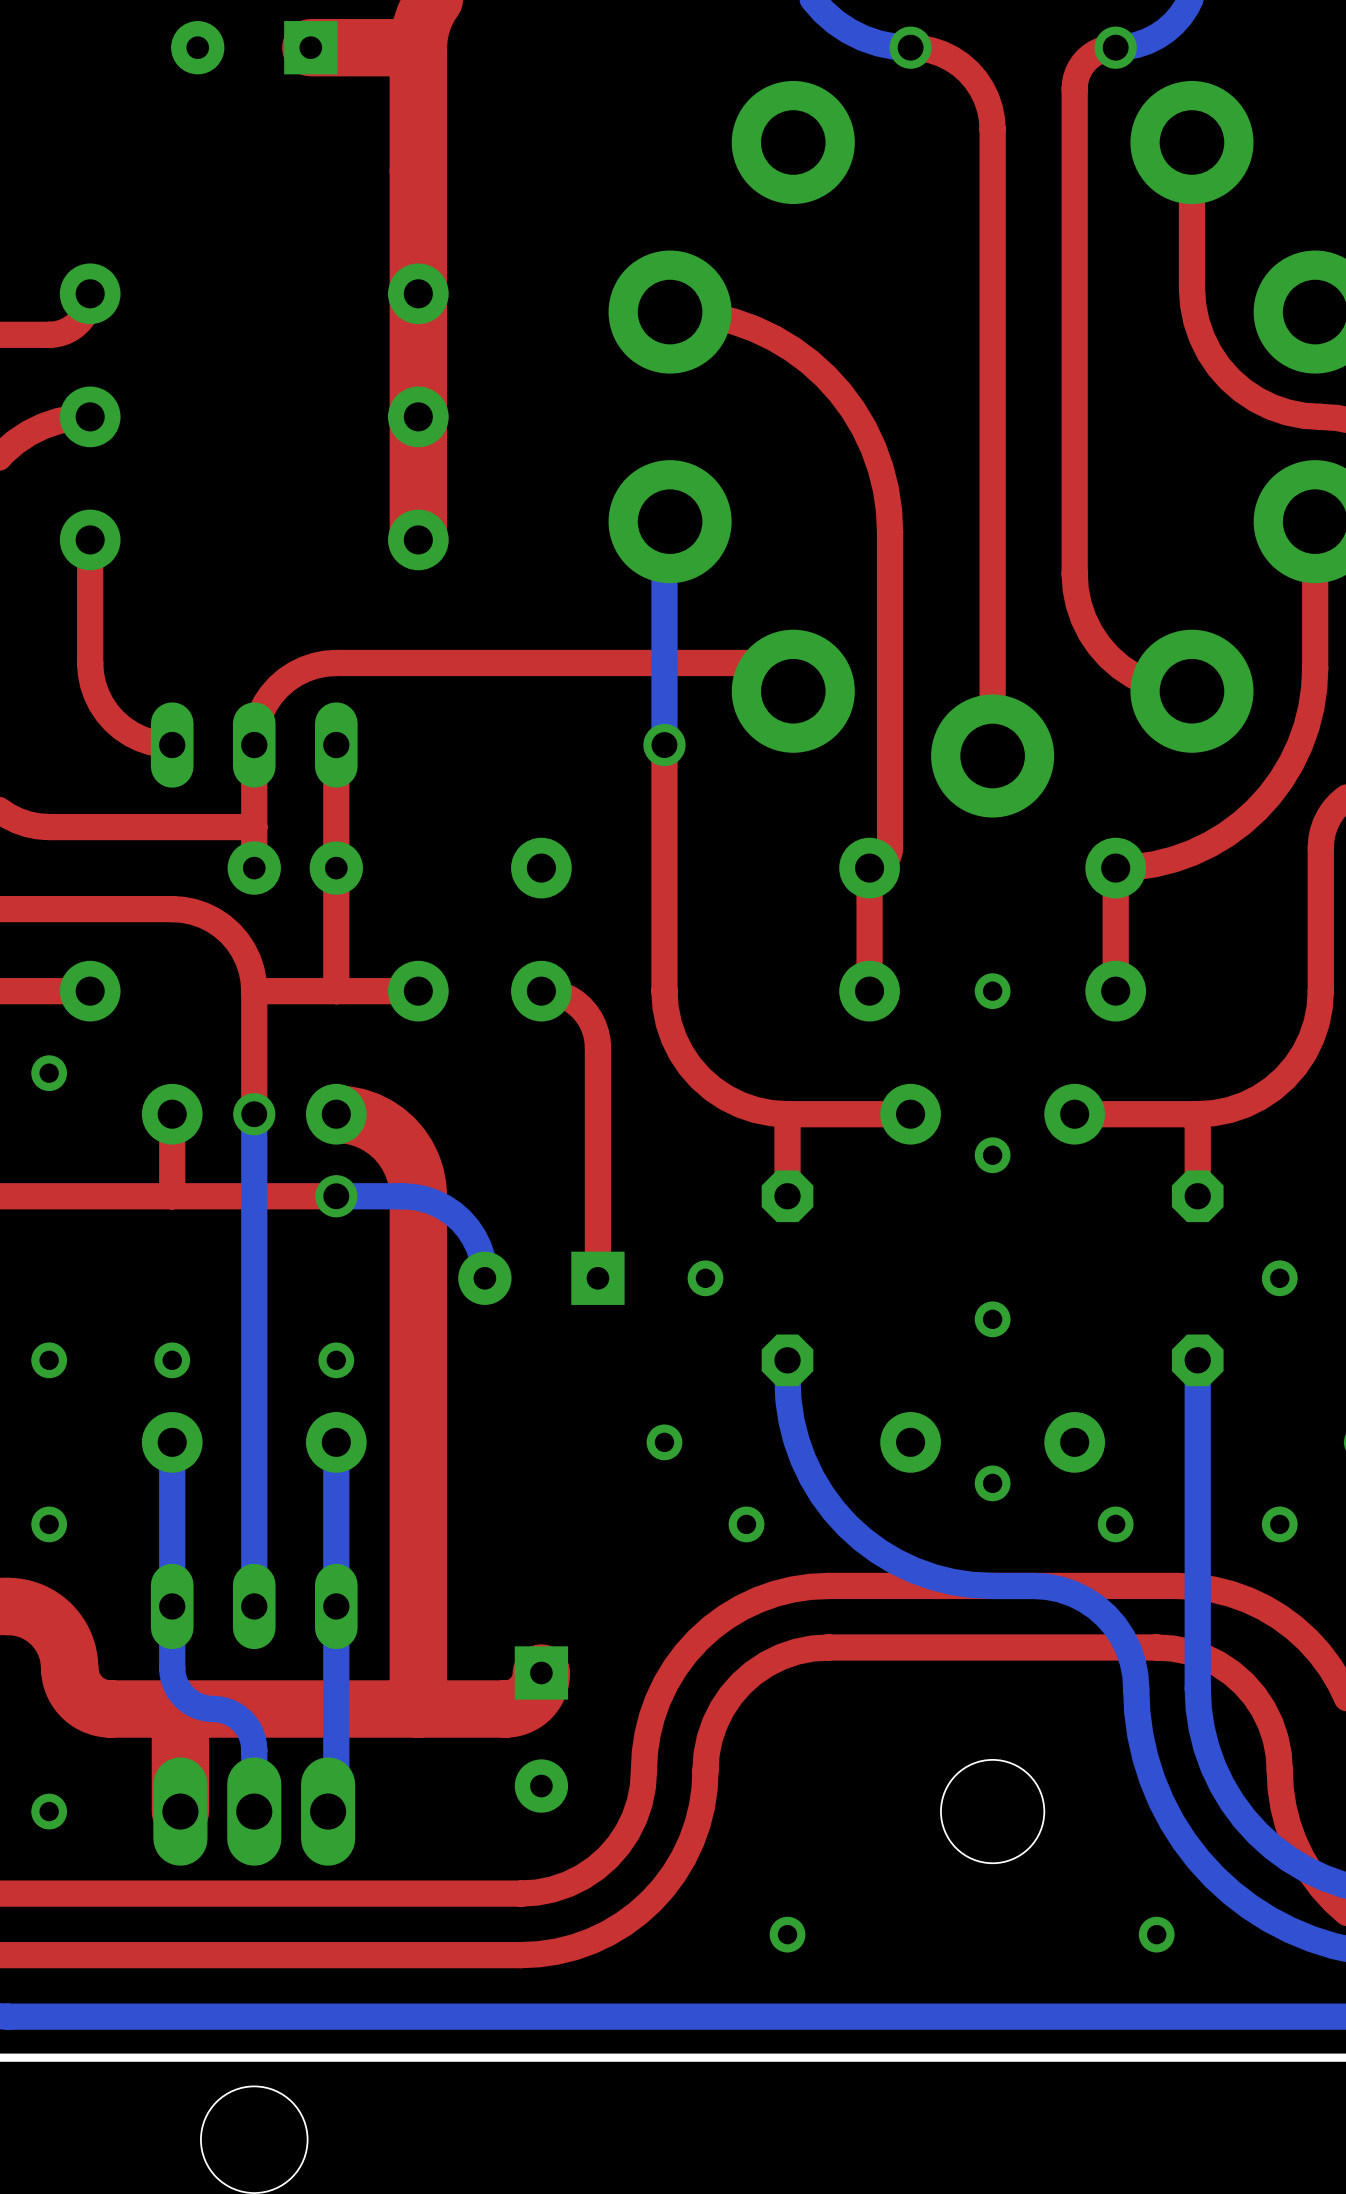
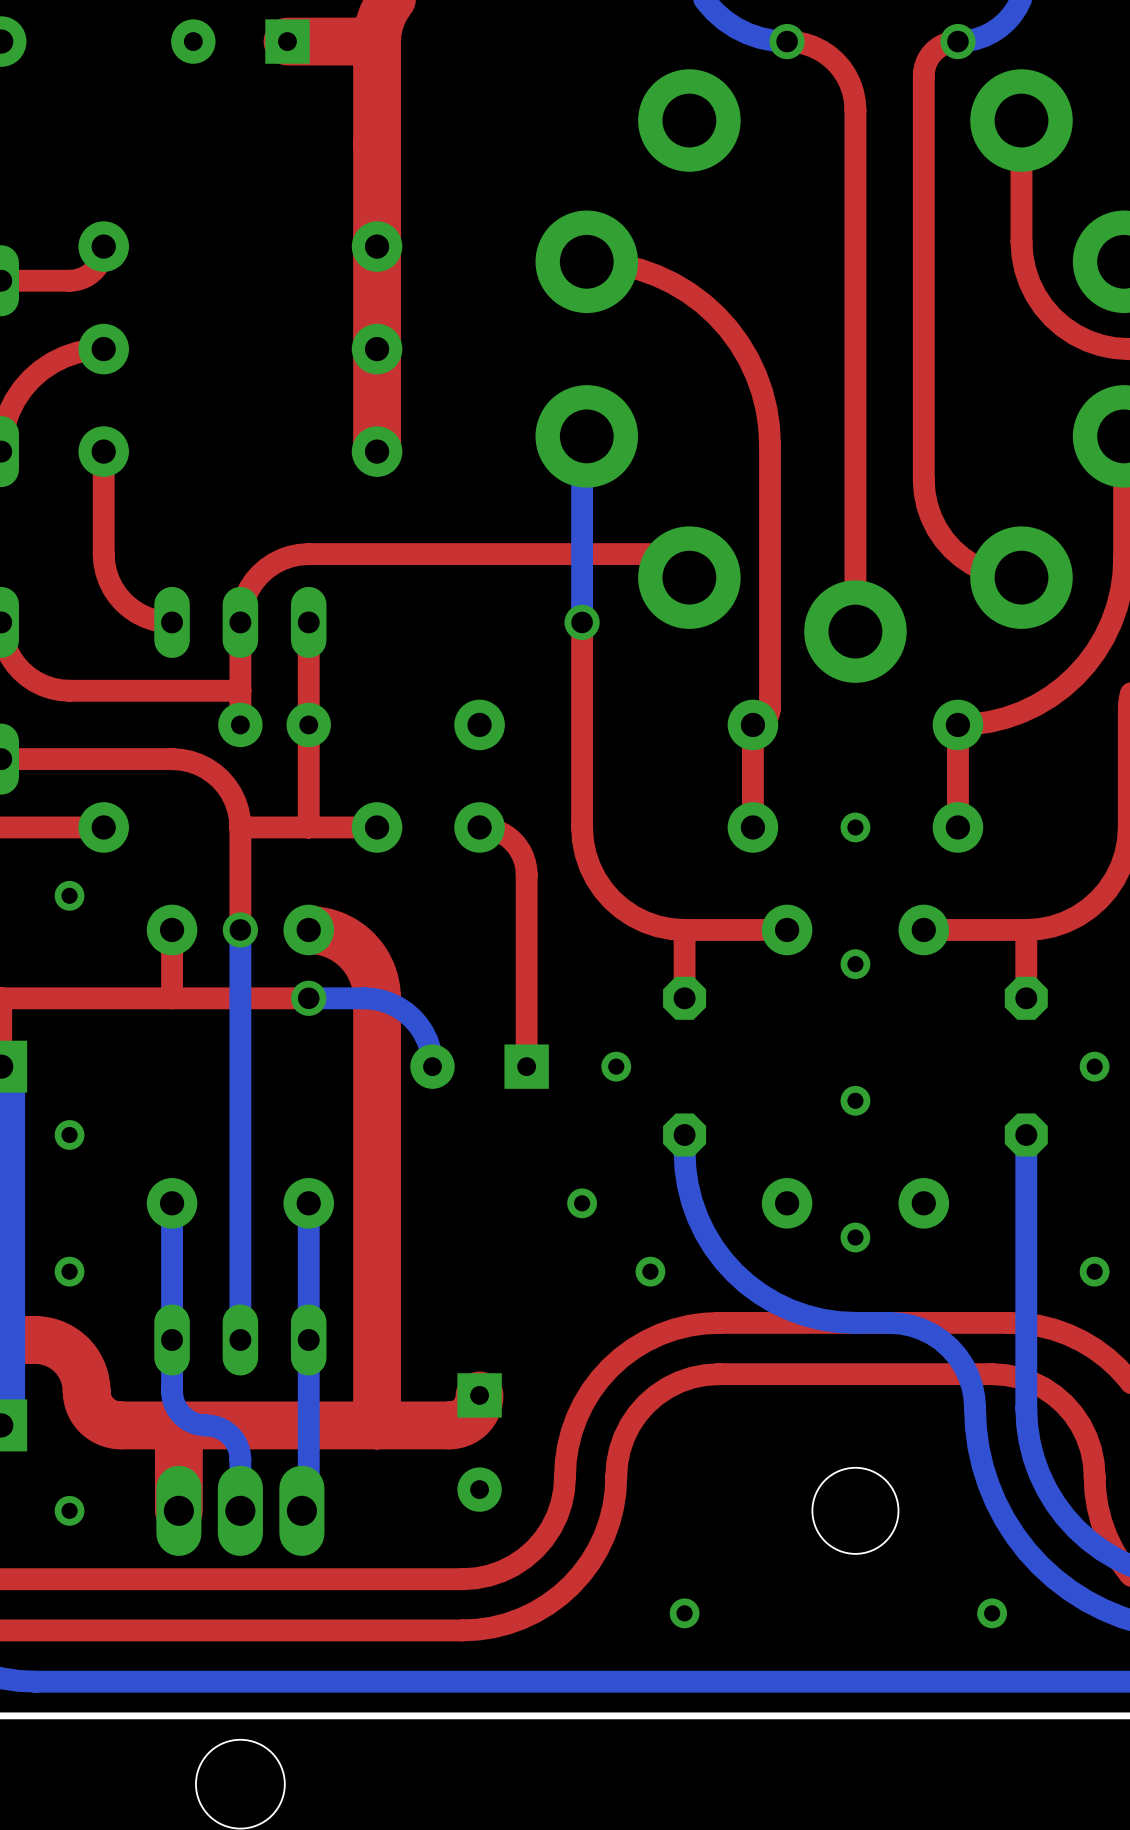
via: (172, 1360) -> none
via: (336, 1360) -> none
via: (1115, 1524) -> none

